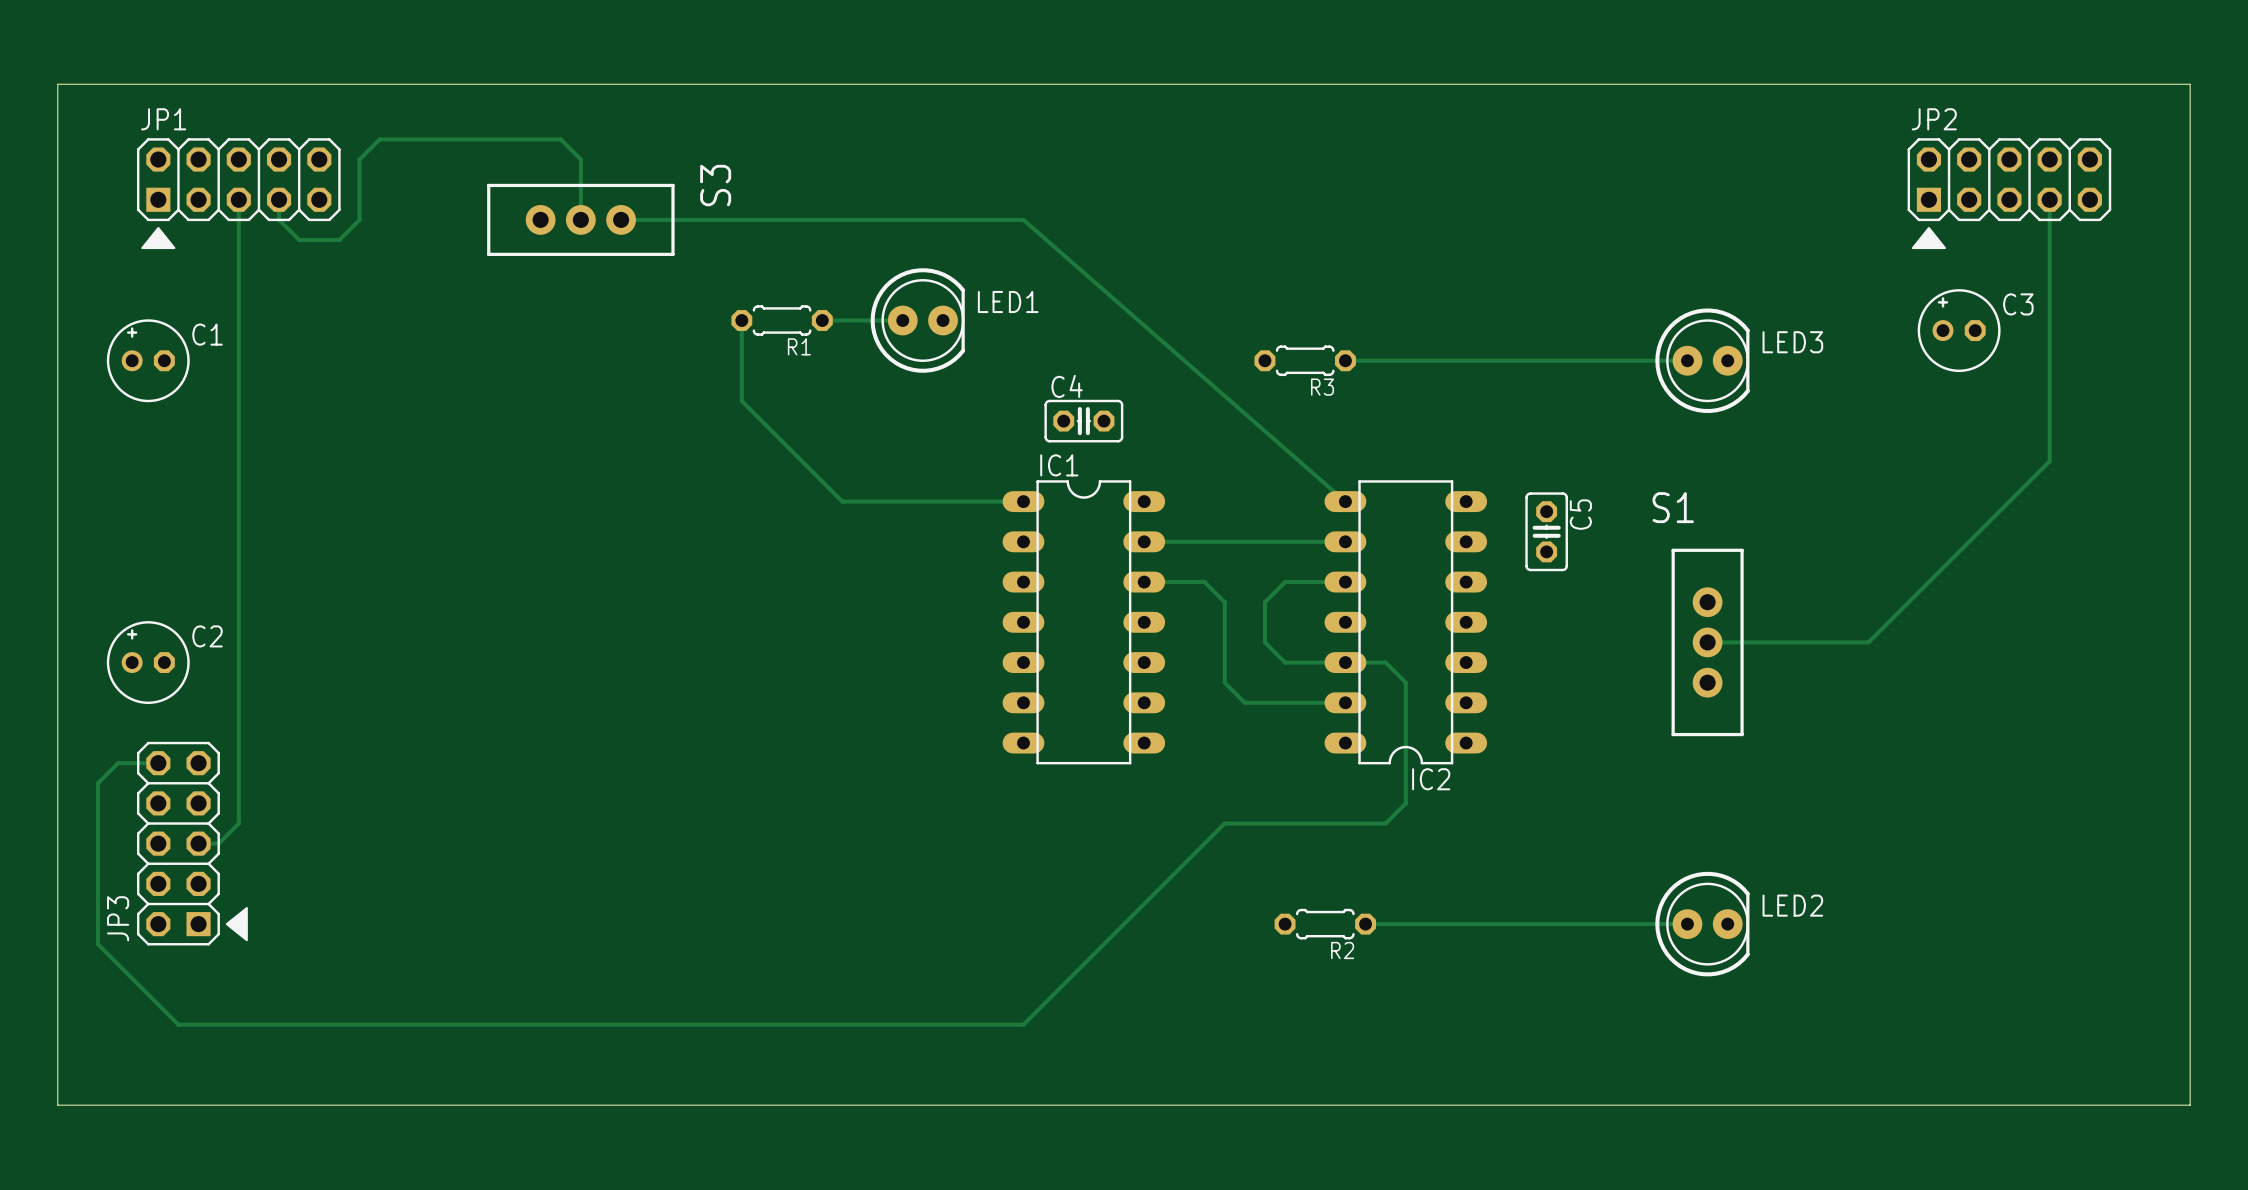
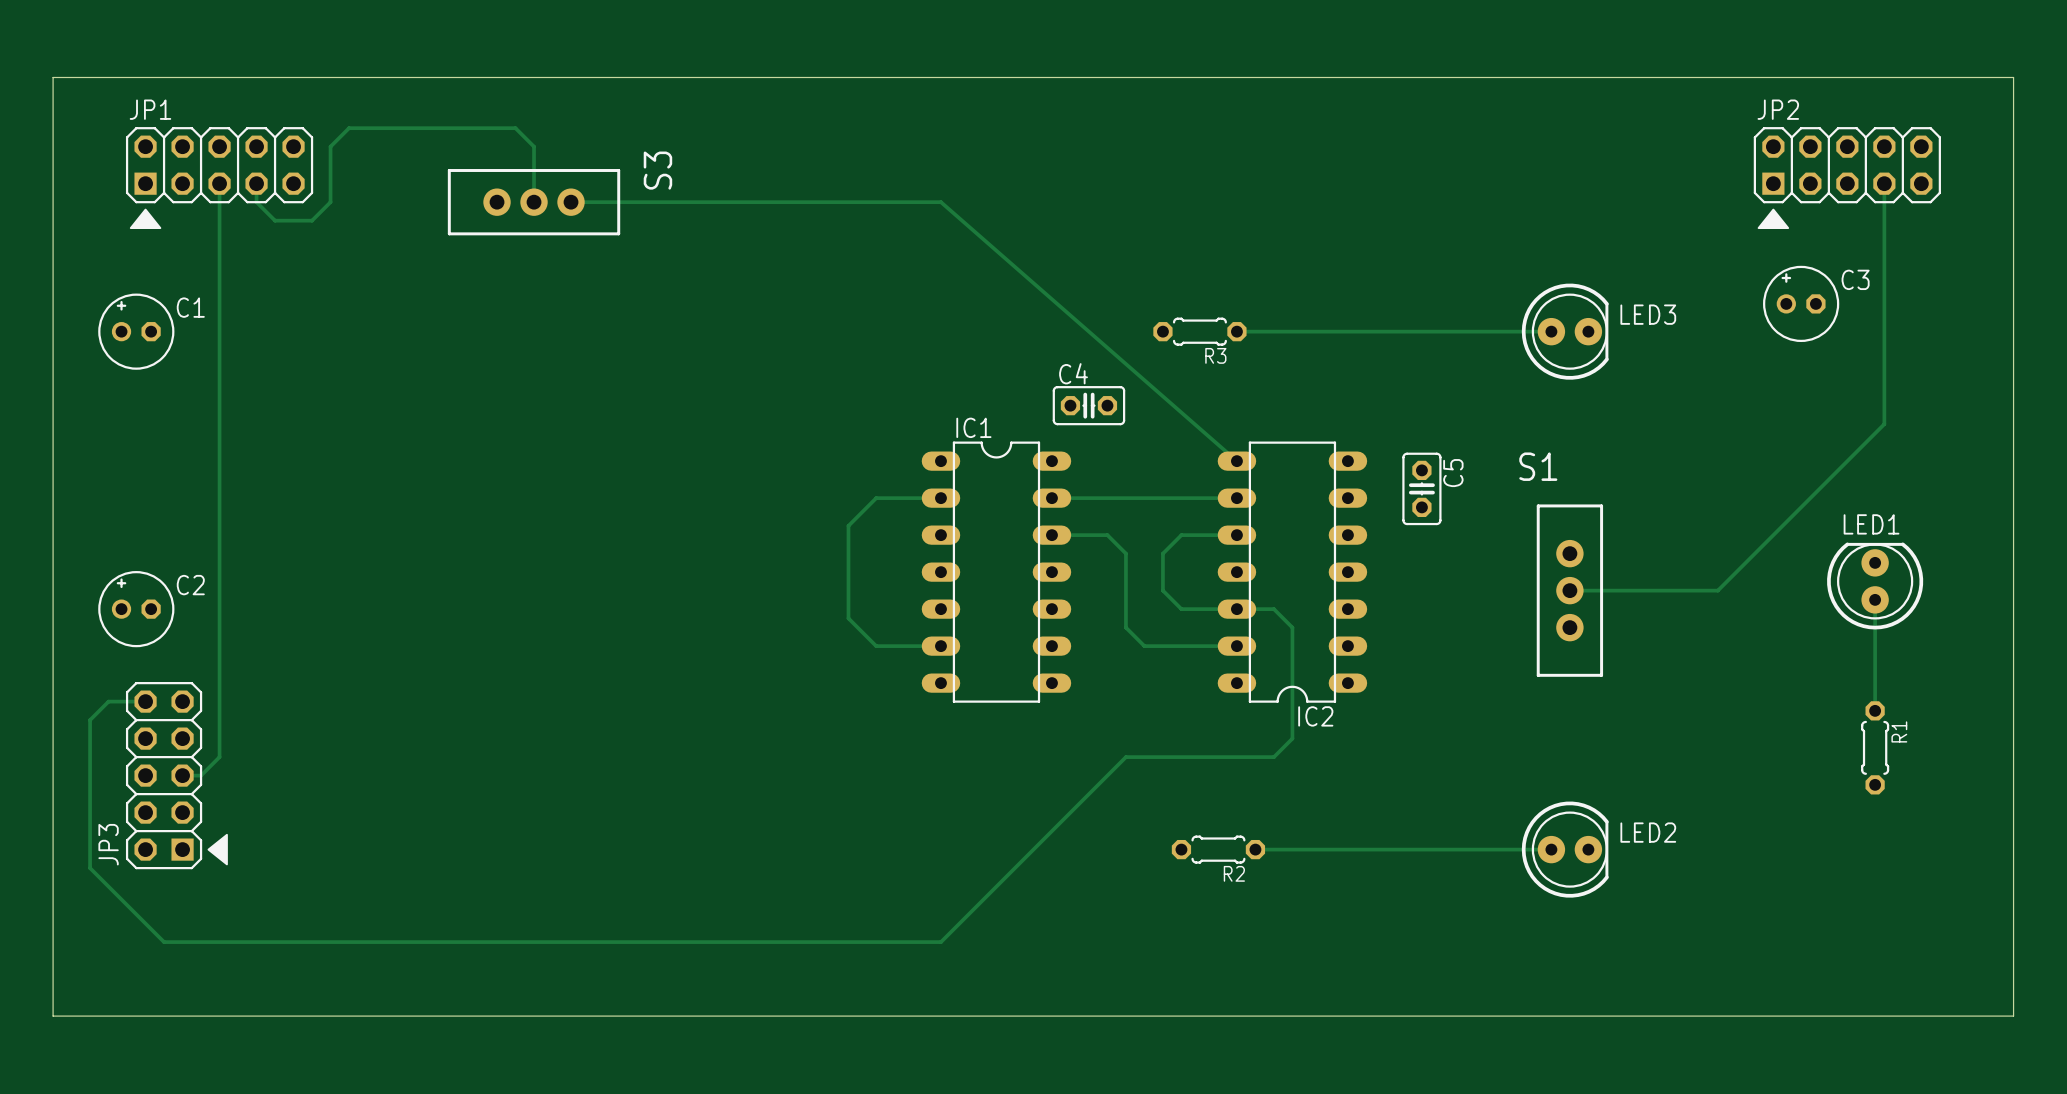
track: (741, 320) (741, 400) (842, 501) (1023, 501) -> none
R1 rotation: 0° (782, 320) -> 90° clockwise (1875, 747)
R1 position: (782, 320) -> (1875, 747)
track: (822, 320) (902, 320) -> none
LED1 rotation: 0° (917, 320) -> 90° counterclockwise (1875, 586)
LED1 position: (917, 320) -> (1875, 586)
R1 name position: R1 (799, 346) -> R1 (1899, 731)
C4 position: (1083, 421) -> (1088, 405)
track: none -> (940, 498) (876, 498) (848, 525) (848, 618) (876, 646) (940, 646)
track: none -> (1875, 599) (1875, 710)

